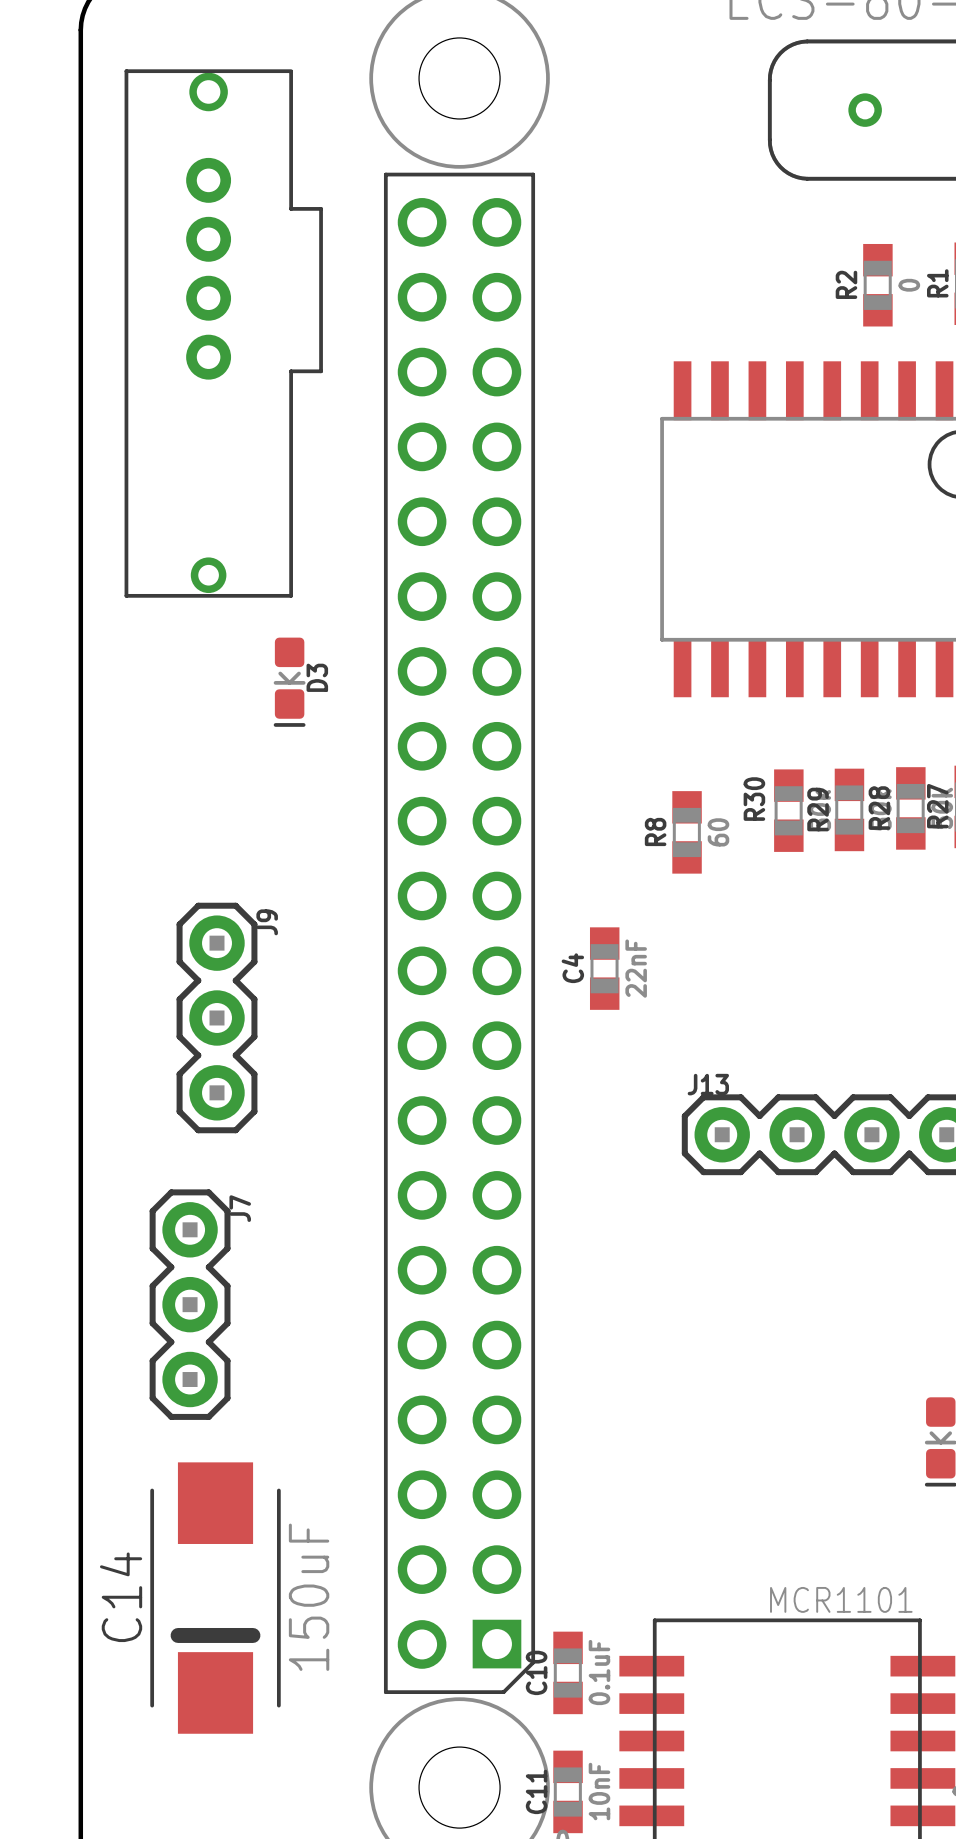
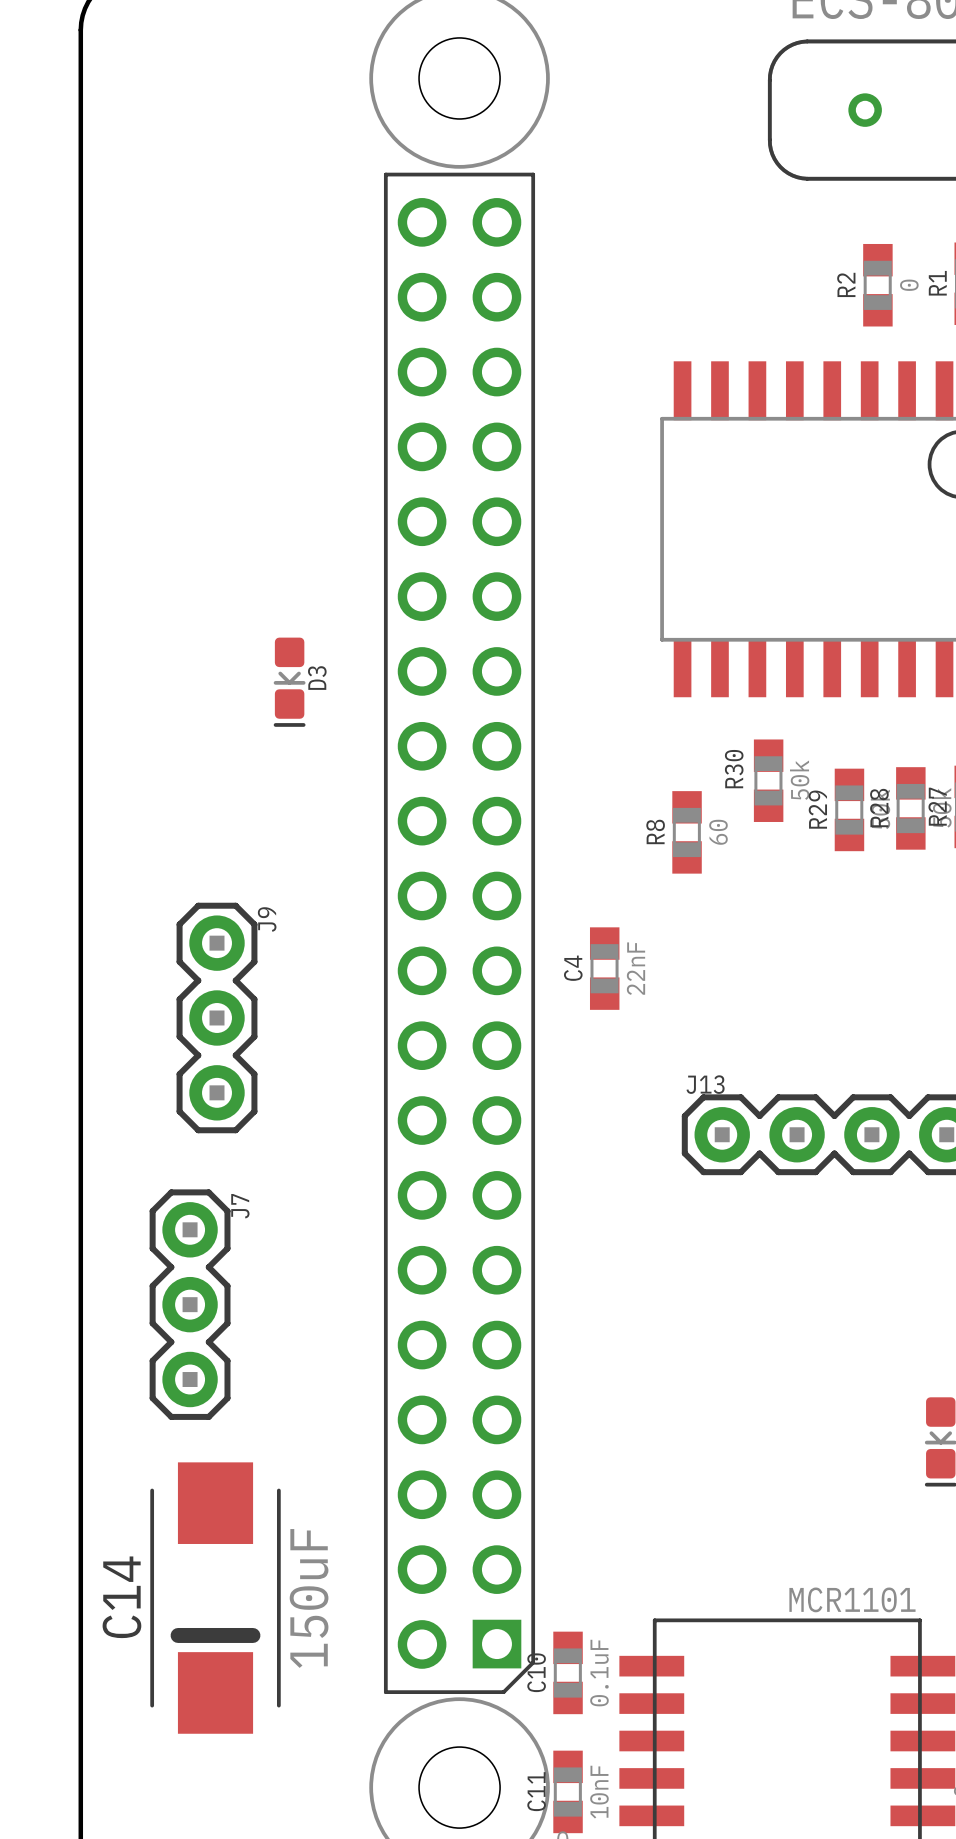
part: (223, 333) -> none
R30 position: (788, 810) -> (768, 780)

